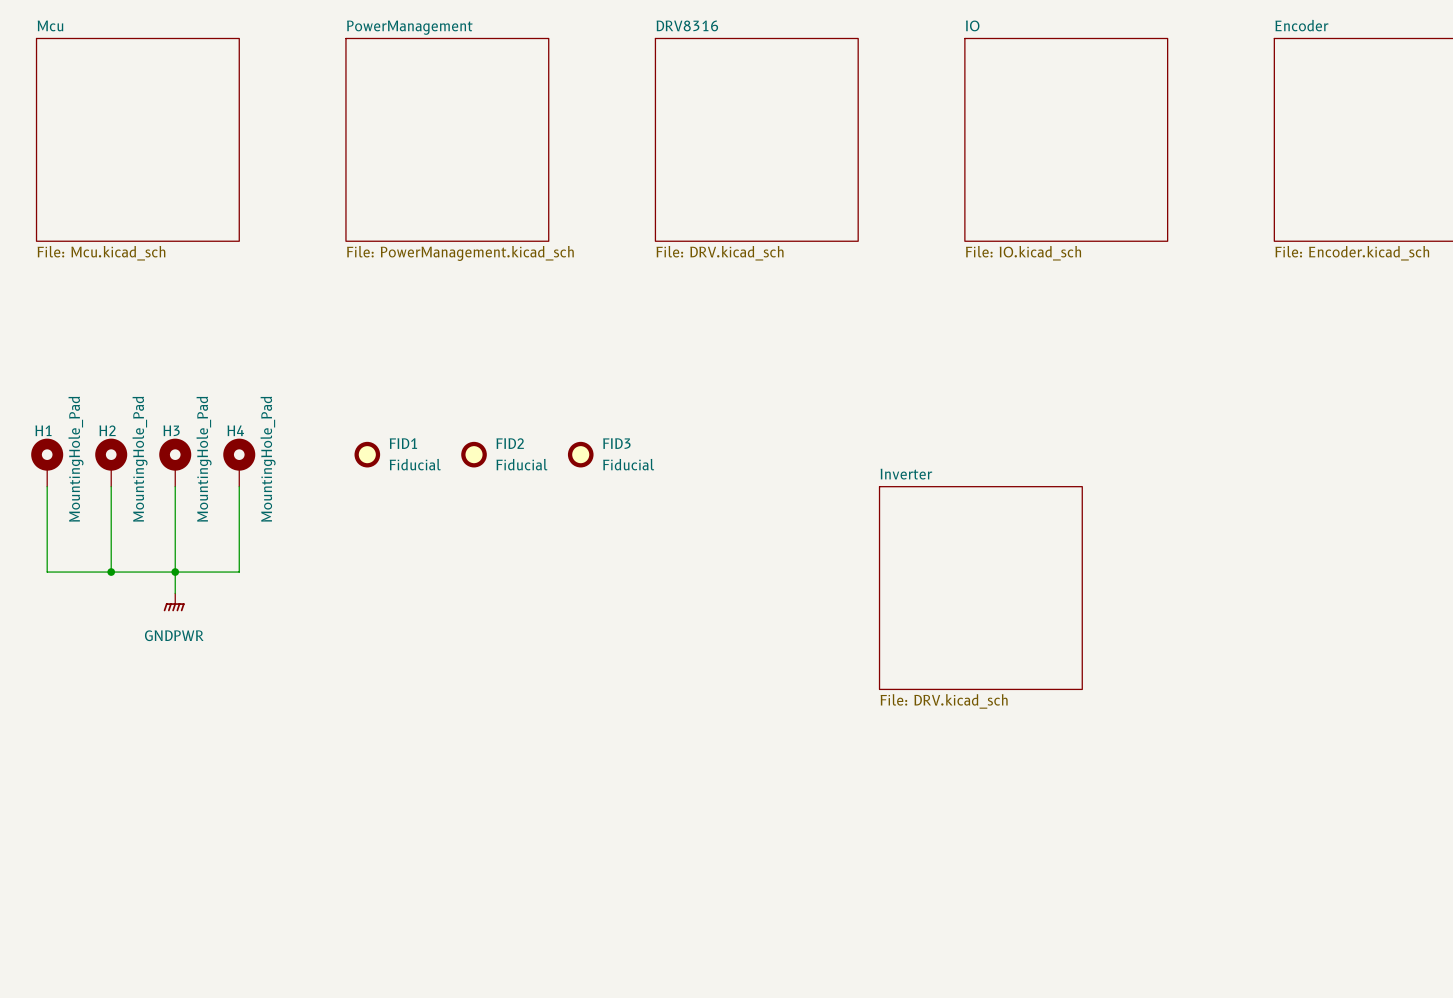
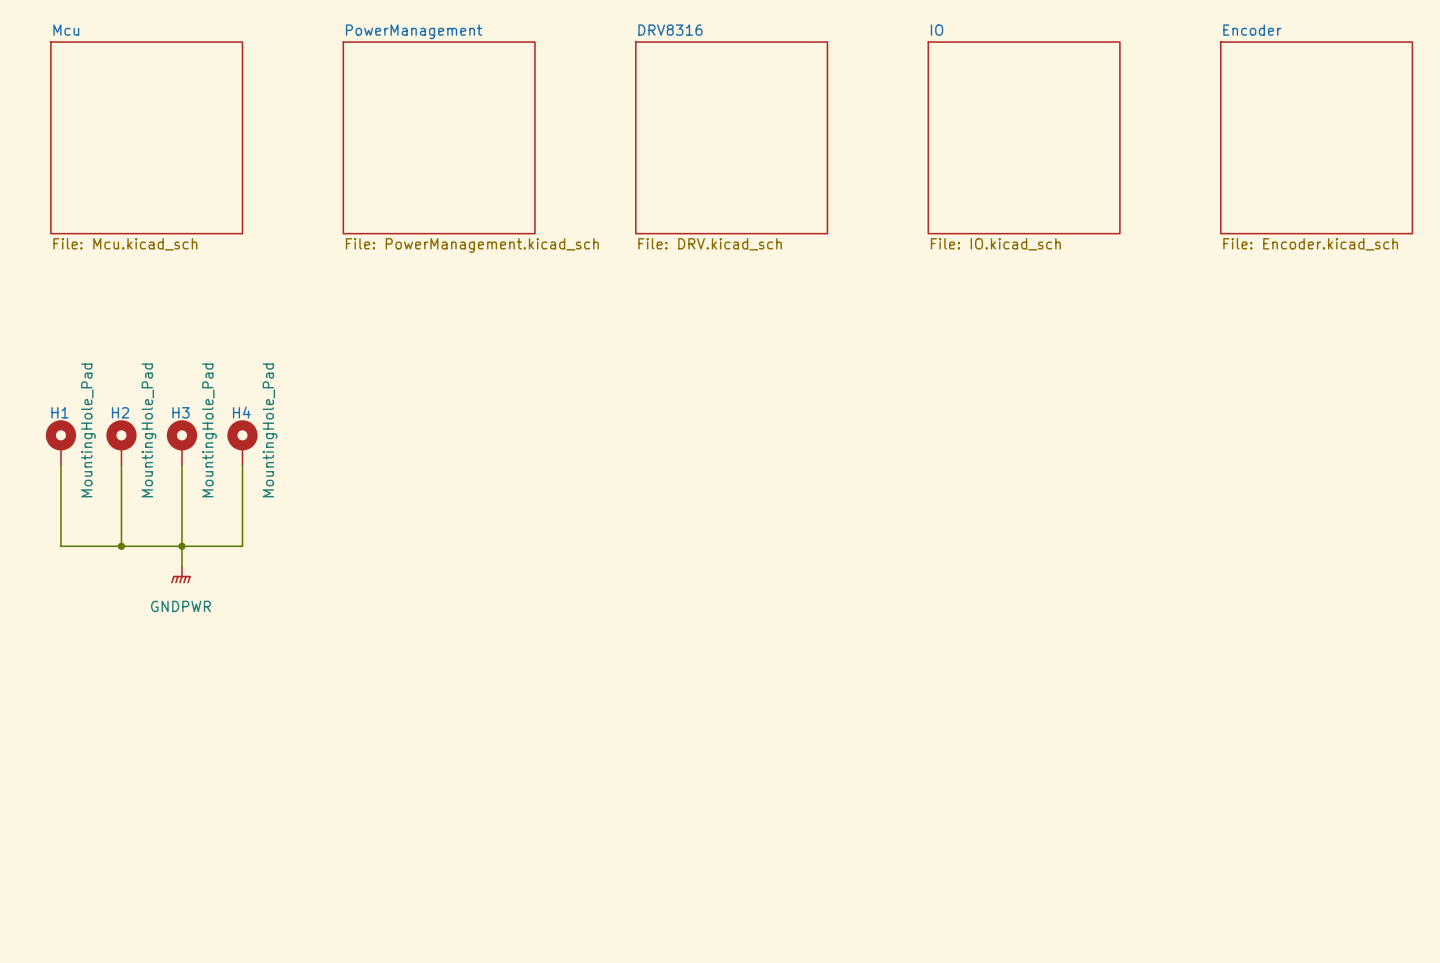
FID1: Fiducial (367, 454) -> none
FID2: Fiducial (474, 454) -> none
FID3: Fiducial (580, 454) -> none
sheet Inverter: File: DRV.kicad_sch (980, 588) -> none

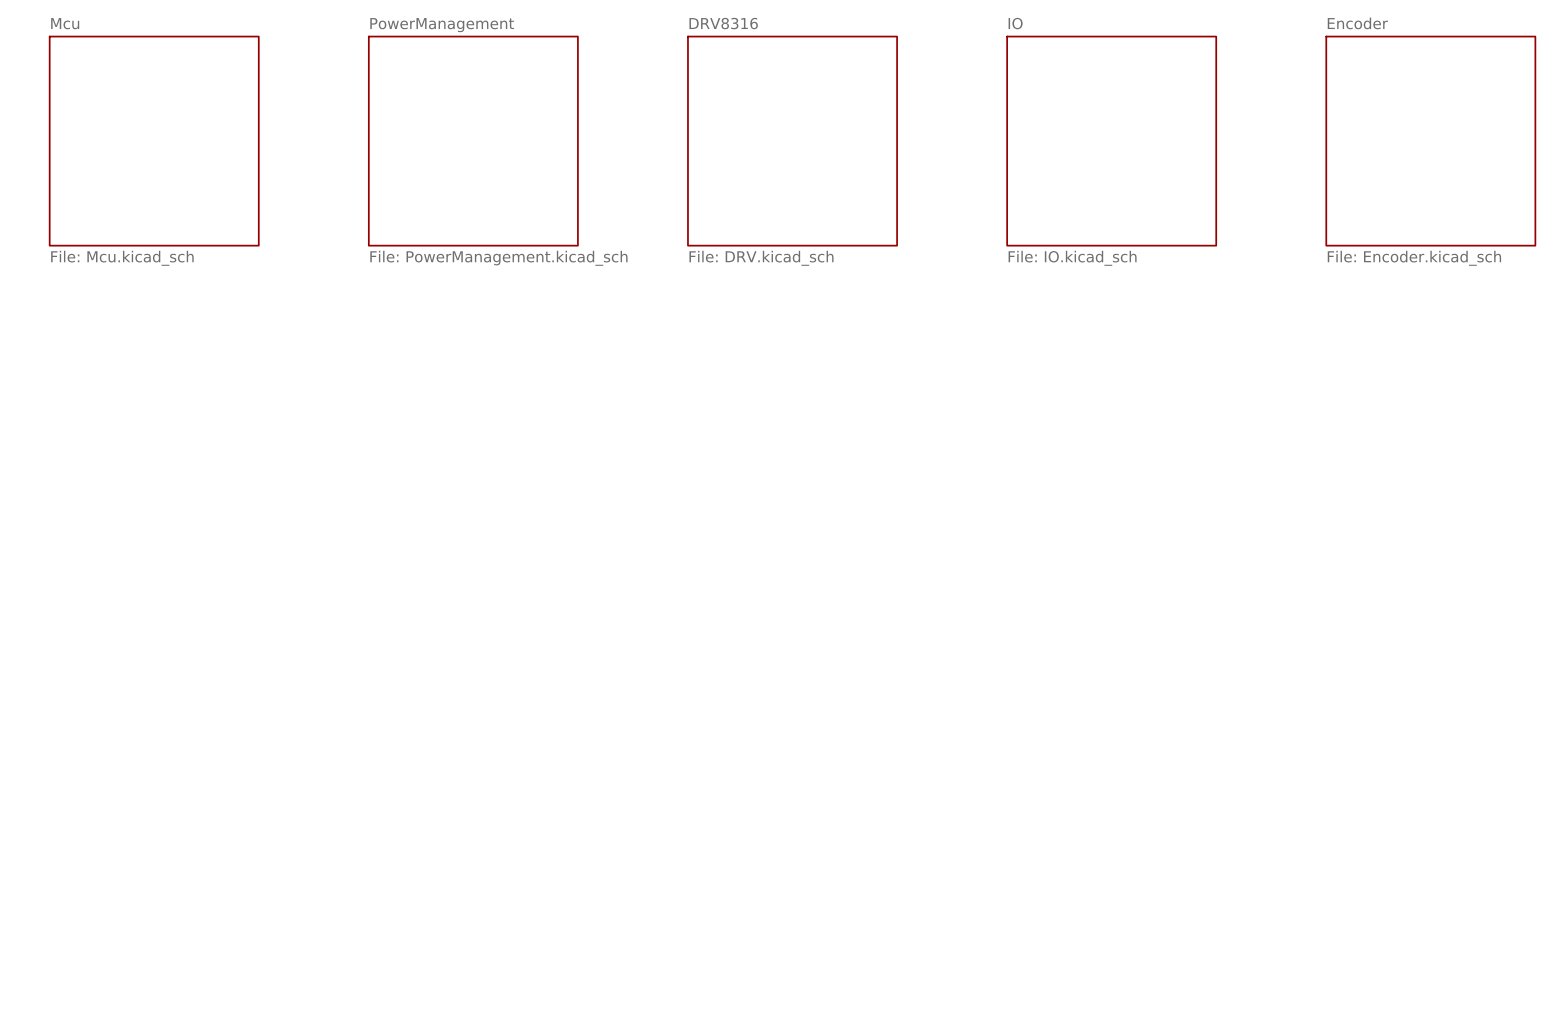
H1: MountingHole_Pad (60, 442) -> none
H2: MountingHole_Pad (121, 442) -> none
H3: MountingHole_Pad (181, 442) -> none
H4: MountingHole_Pad (242, 442) -> none
wire: (60, 465) (60, 546) (242, 546) (242, 465) -> none
wire: (121, 465) (121, 546) -> none
wire: (181, 465) (181, 566) -> none
junction: (121, 546) -> none
junction: (181, 546) -> none
power symbol: GNDPWR (180, 574) -> none

